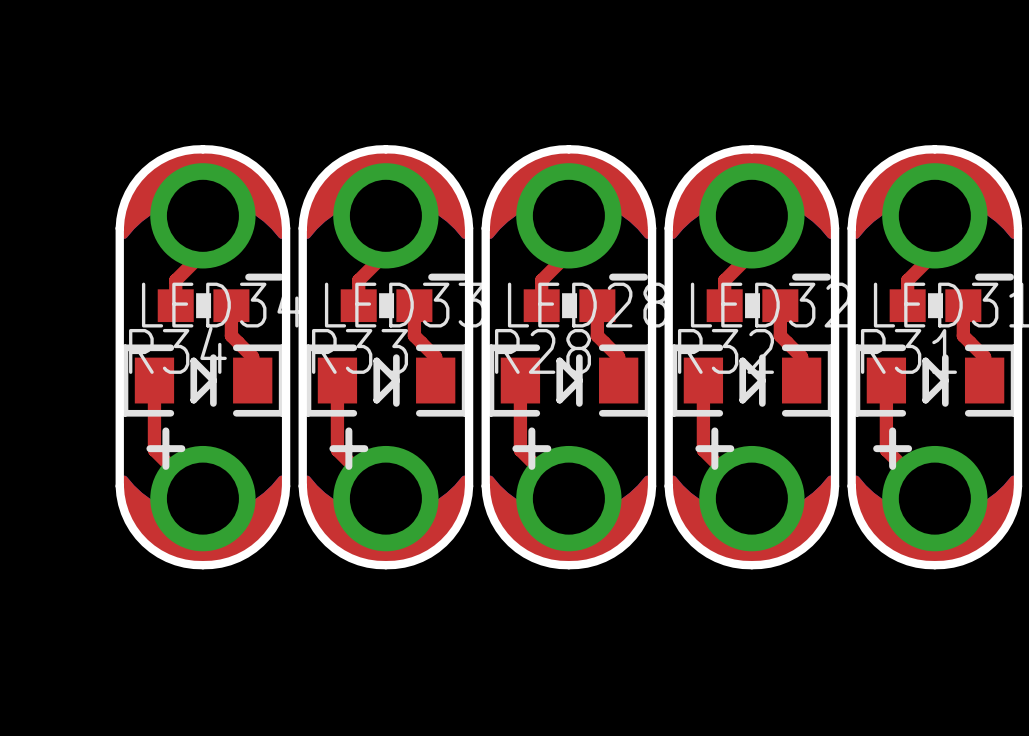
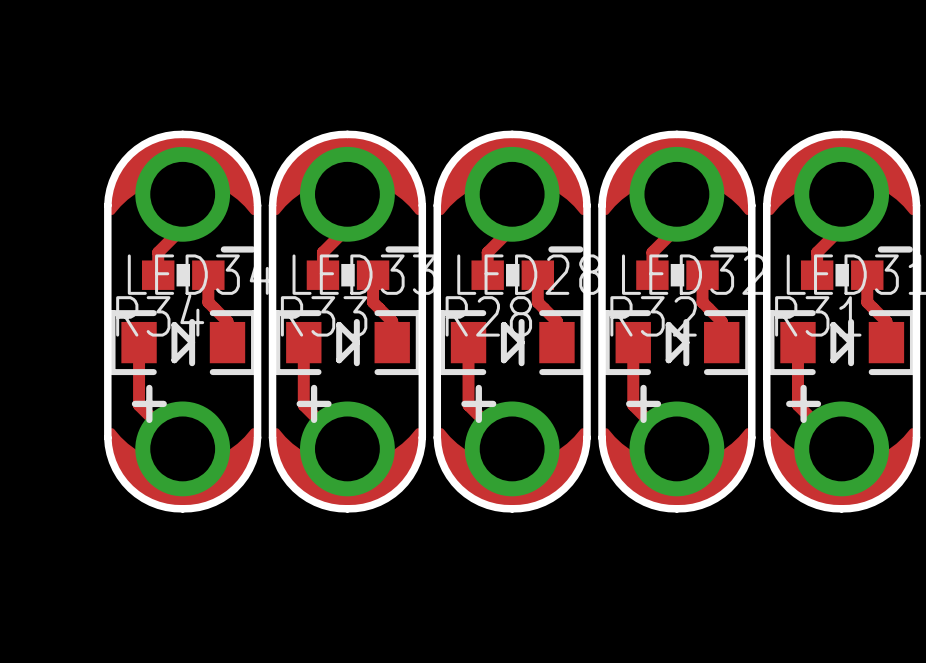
part footprint: [120, 147, 286, 269] -> [108, 132, 257, 242]
part footprint: [303, 147, 469, 269] -> [273, 132, 422, 242]
part footprint: [486, 147, 652, 269] -> [438, 132, 587, 242]
part footprint: [669, 147, 835, 269] -> [602, 132, 751, 242]
part footprint: [852, 147, 1018, 269] -> [767, 132, 916, 242]
part footprint: [120, 445, 286, 568] -> [108, 401, 257, 511]
part footprint: [303, 445, 469, 568] -> [273, 401, 422, 511]
part footprint: [486, 445, 652, 568] -> [438, 401, 587, 511]
part footprint: [669, 445, 835, 568] -> [602, 401, 751, 511]
part footprint: [852, 445, 1018, 568] -> [767, 401, 916, 511]

